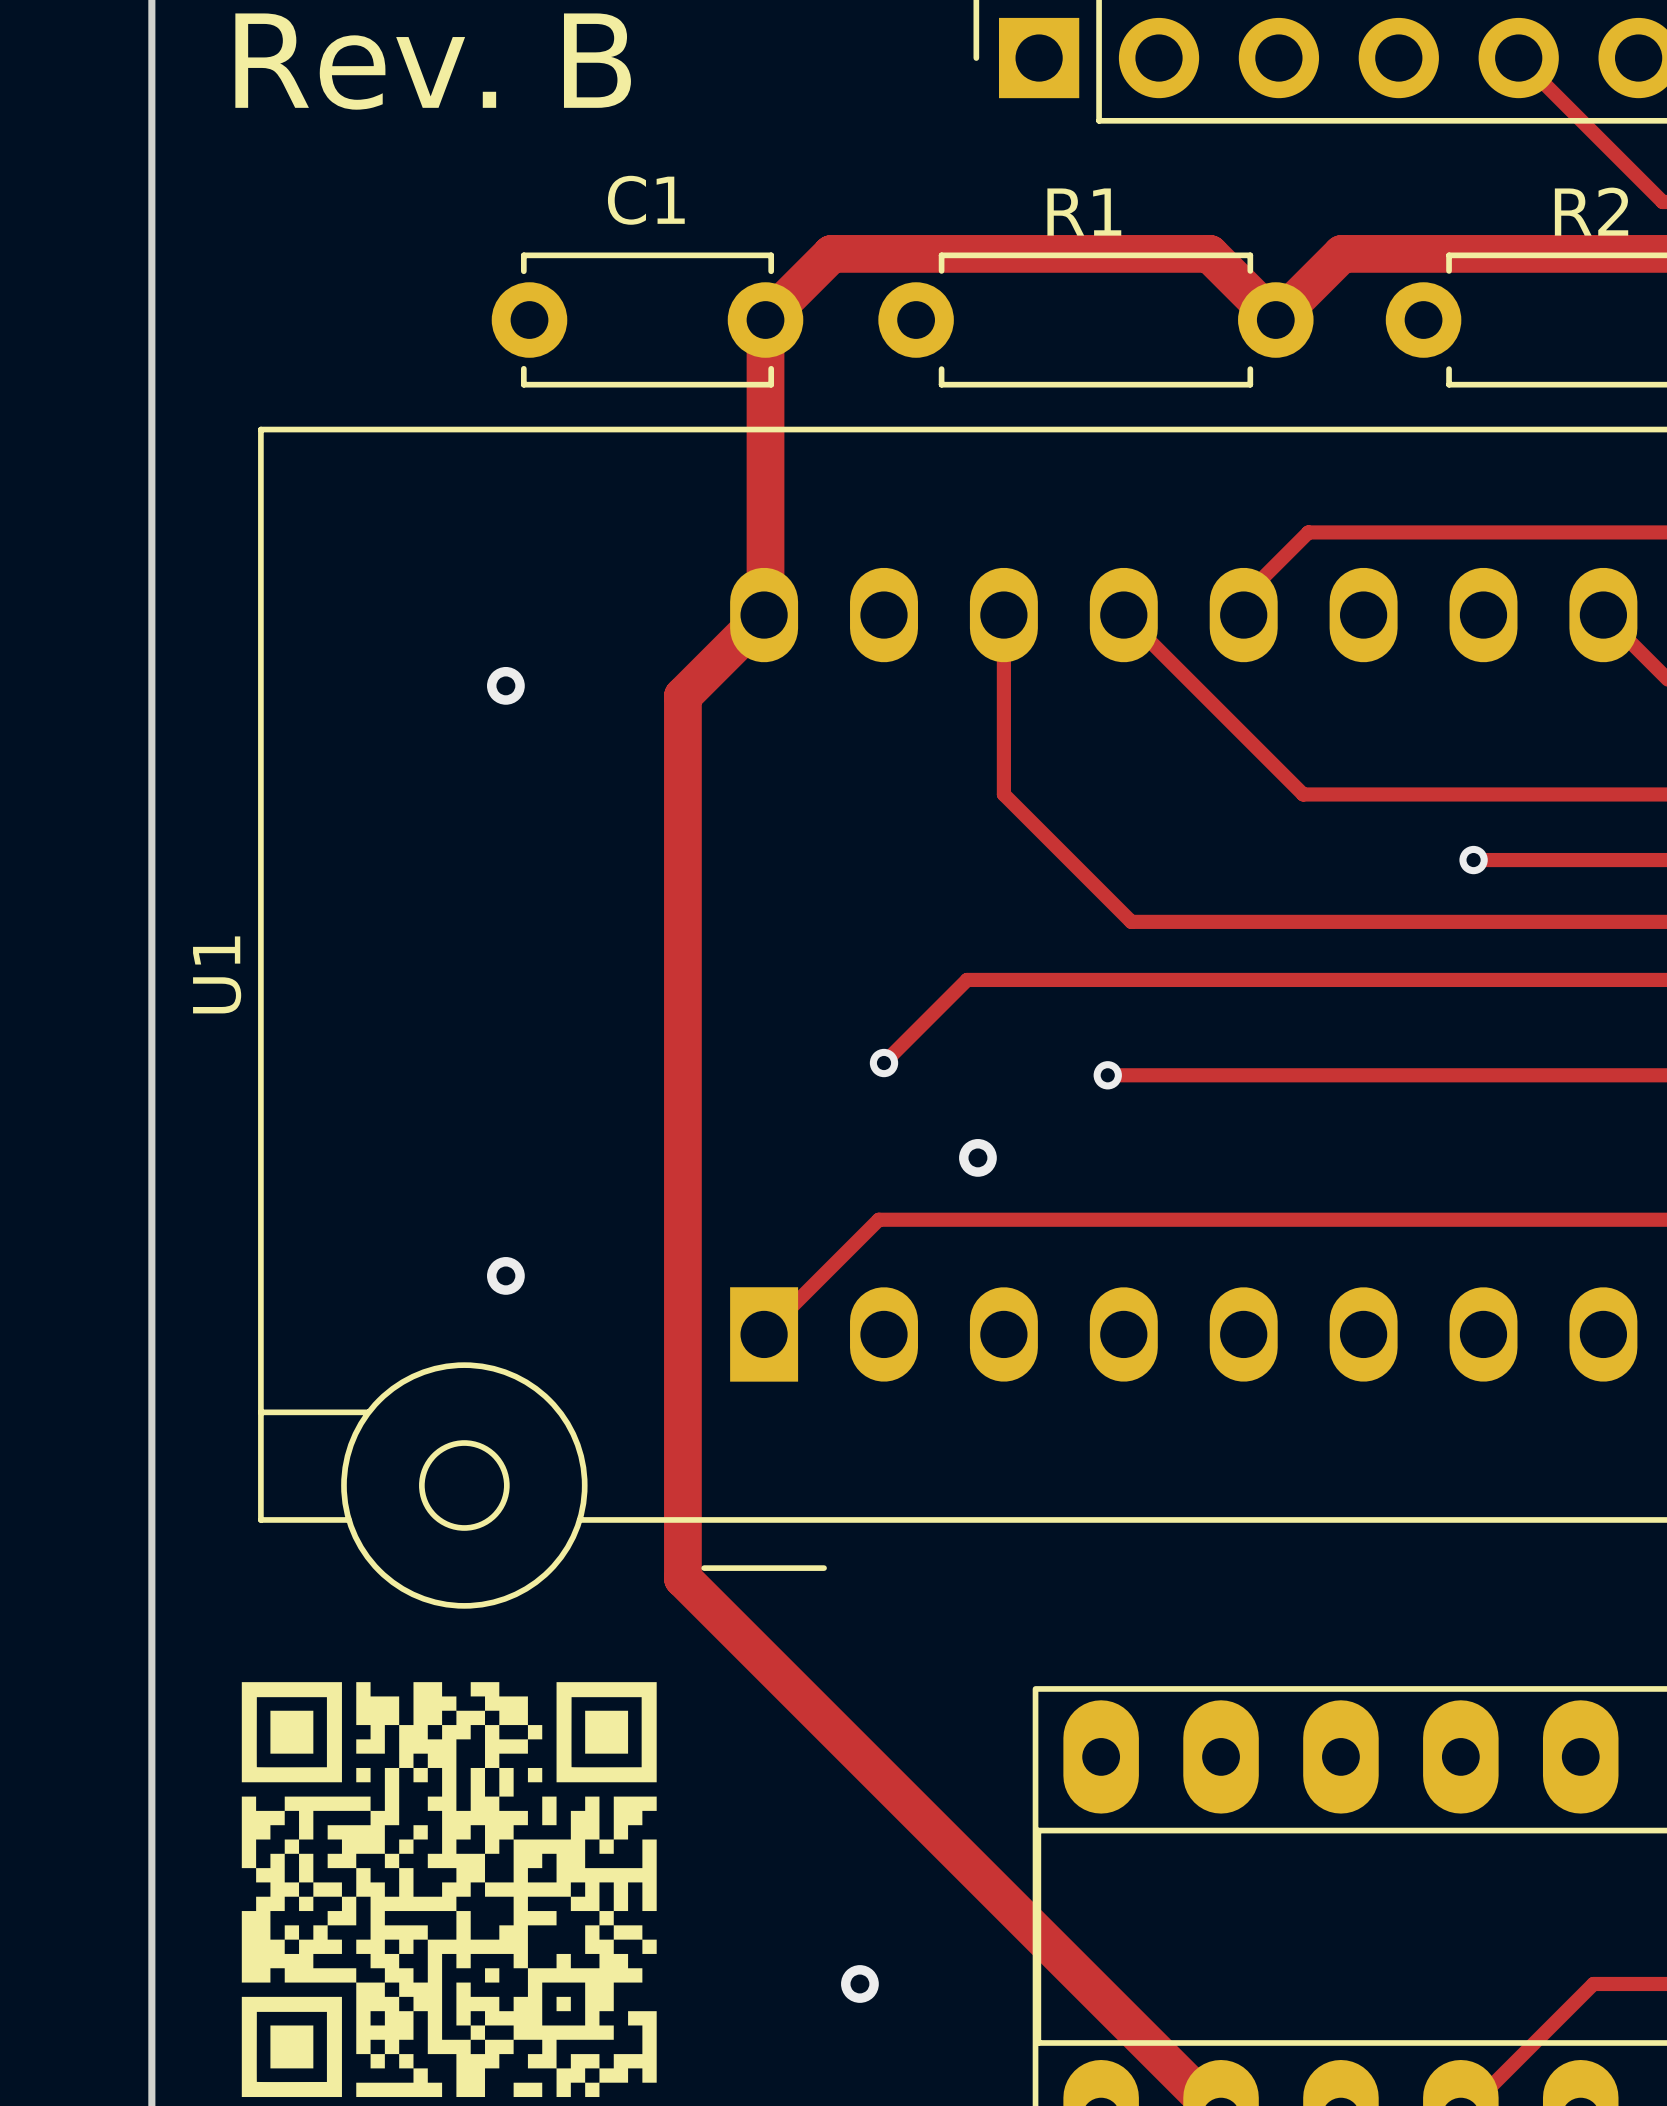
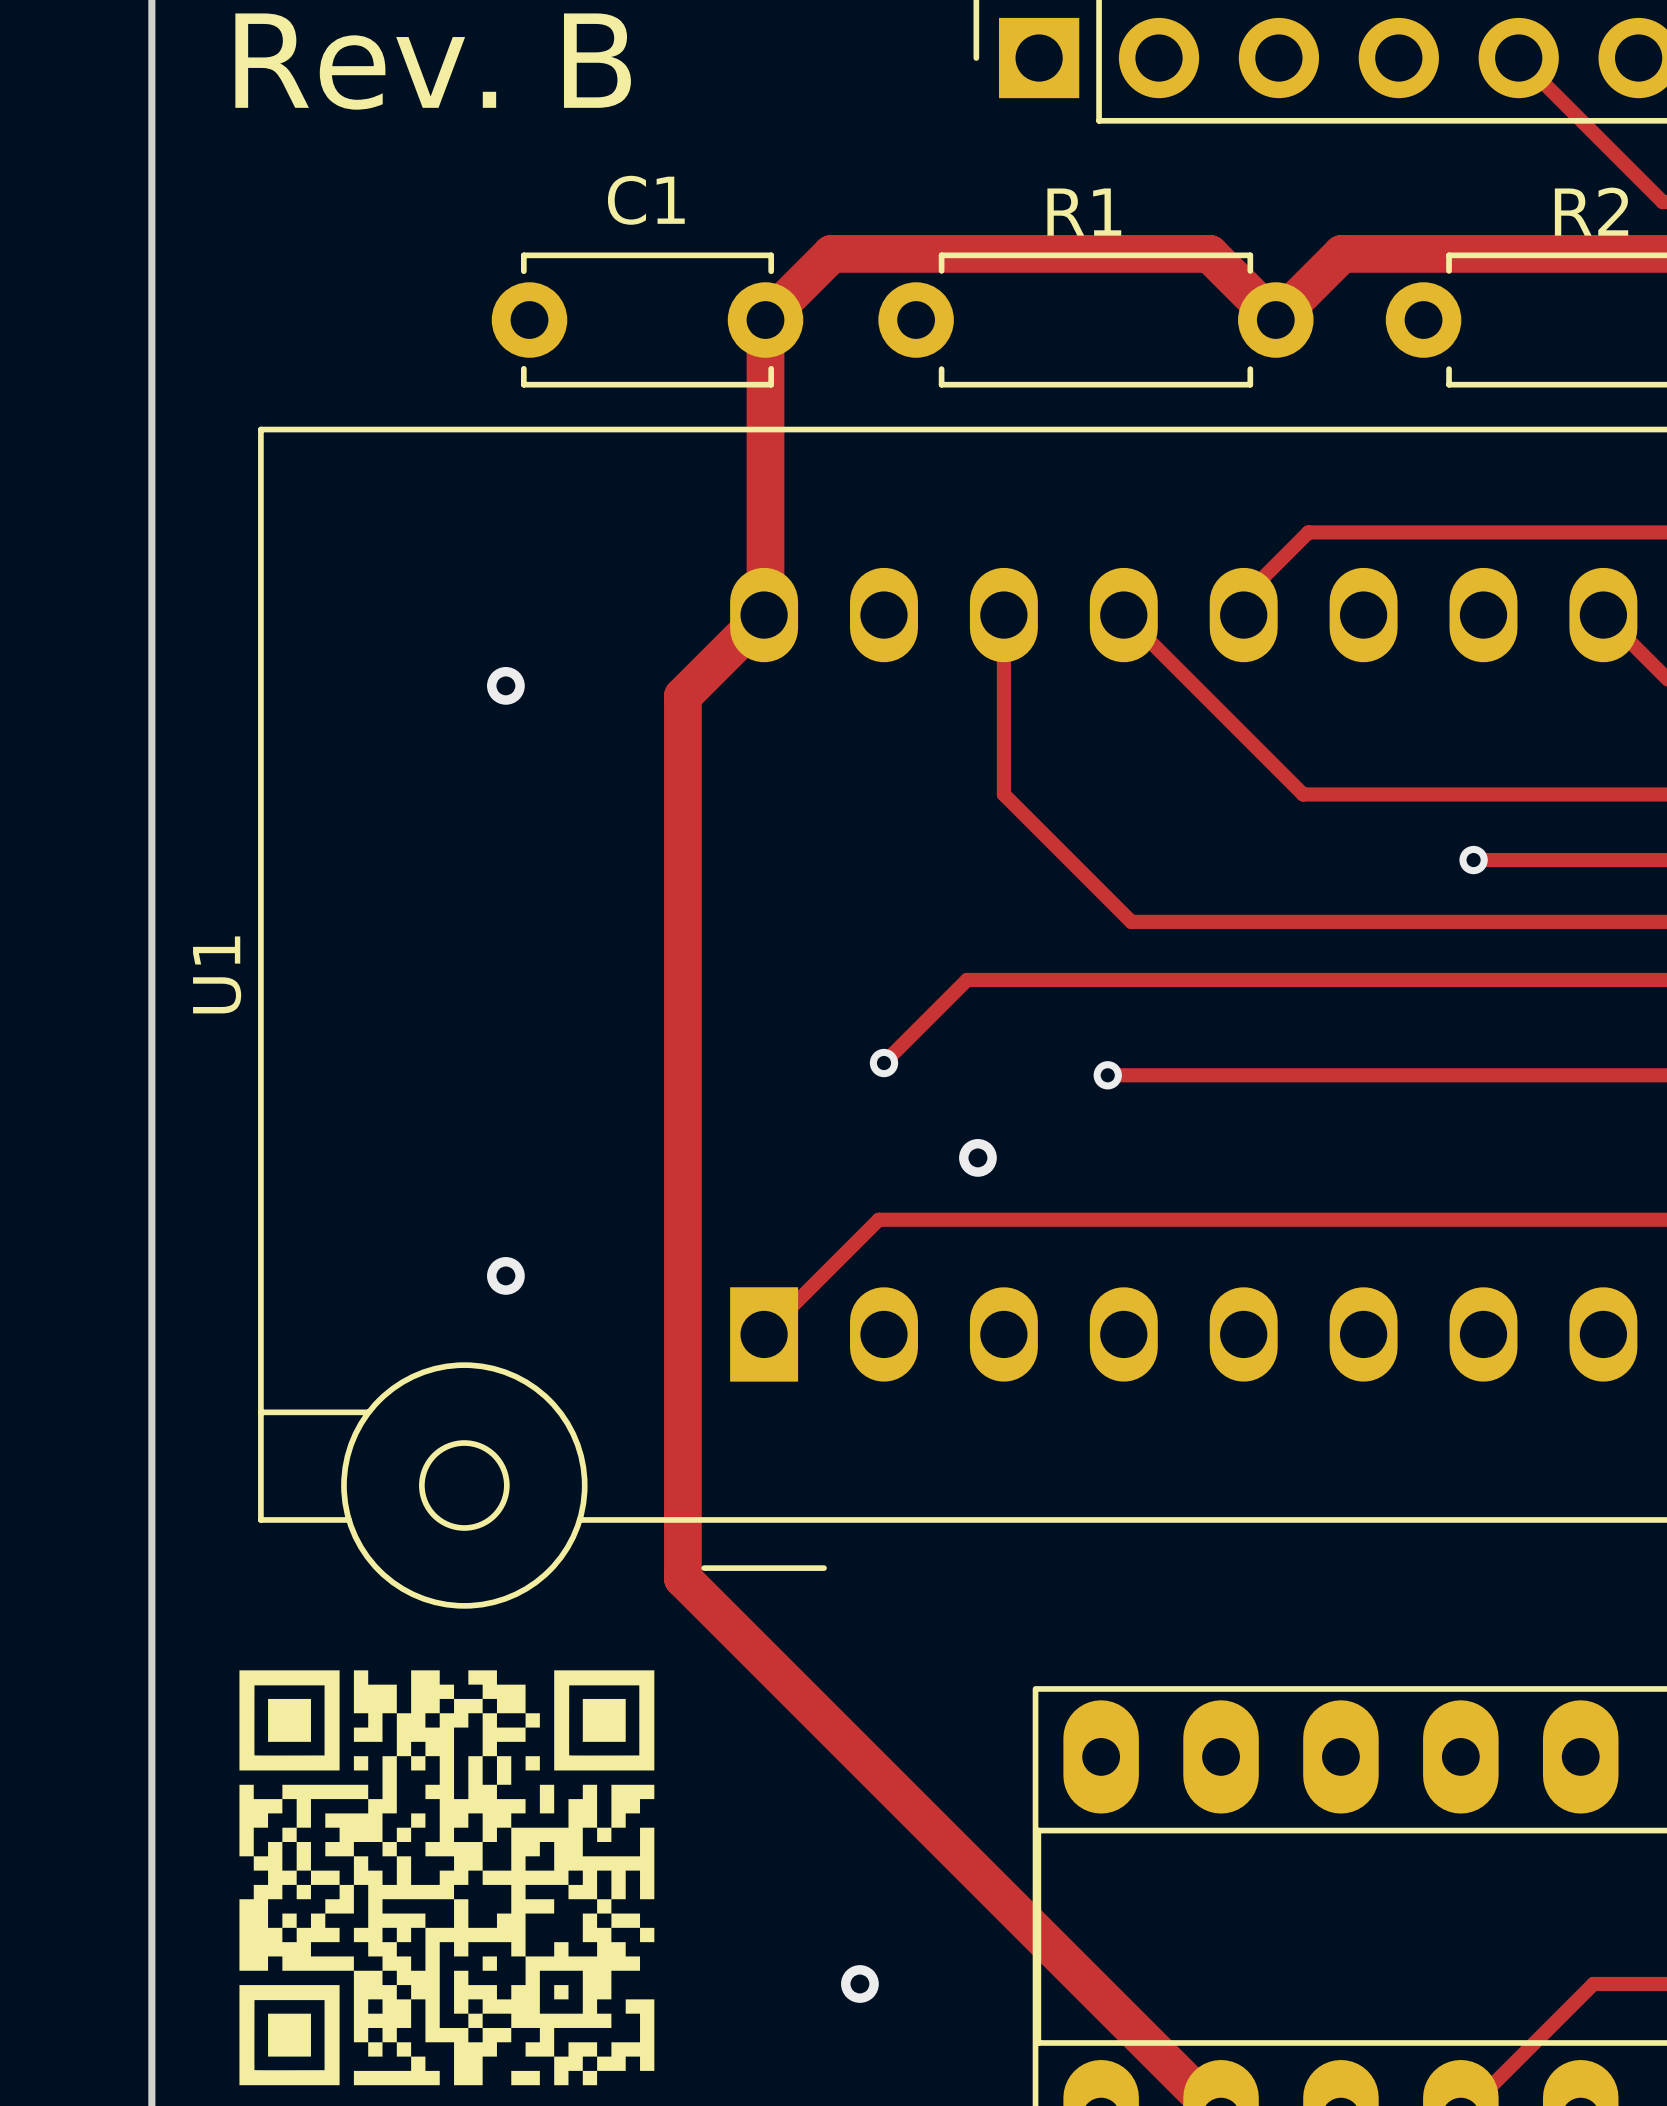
drawing position: (449, 1889) -> (446, 1877)

